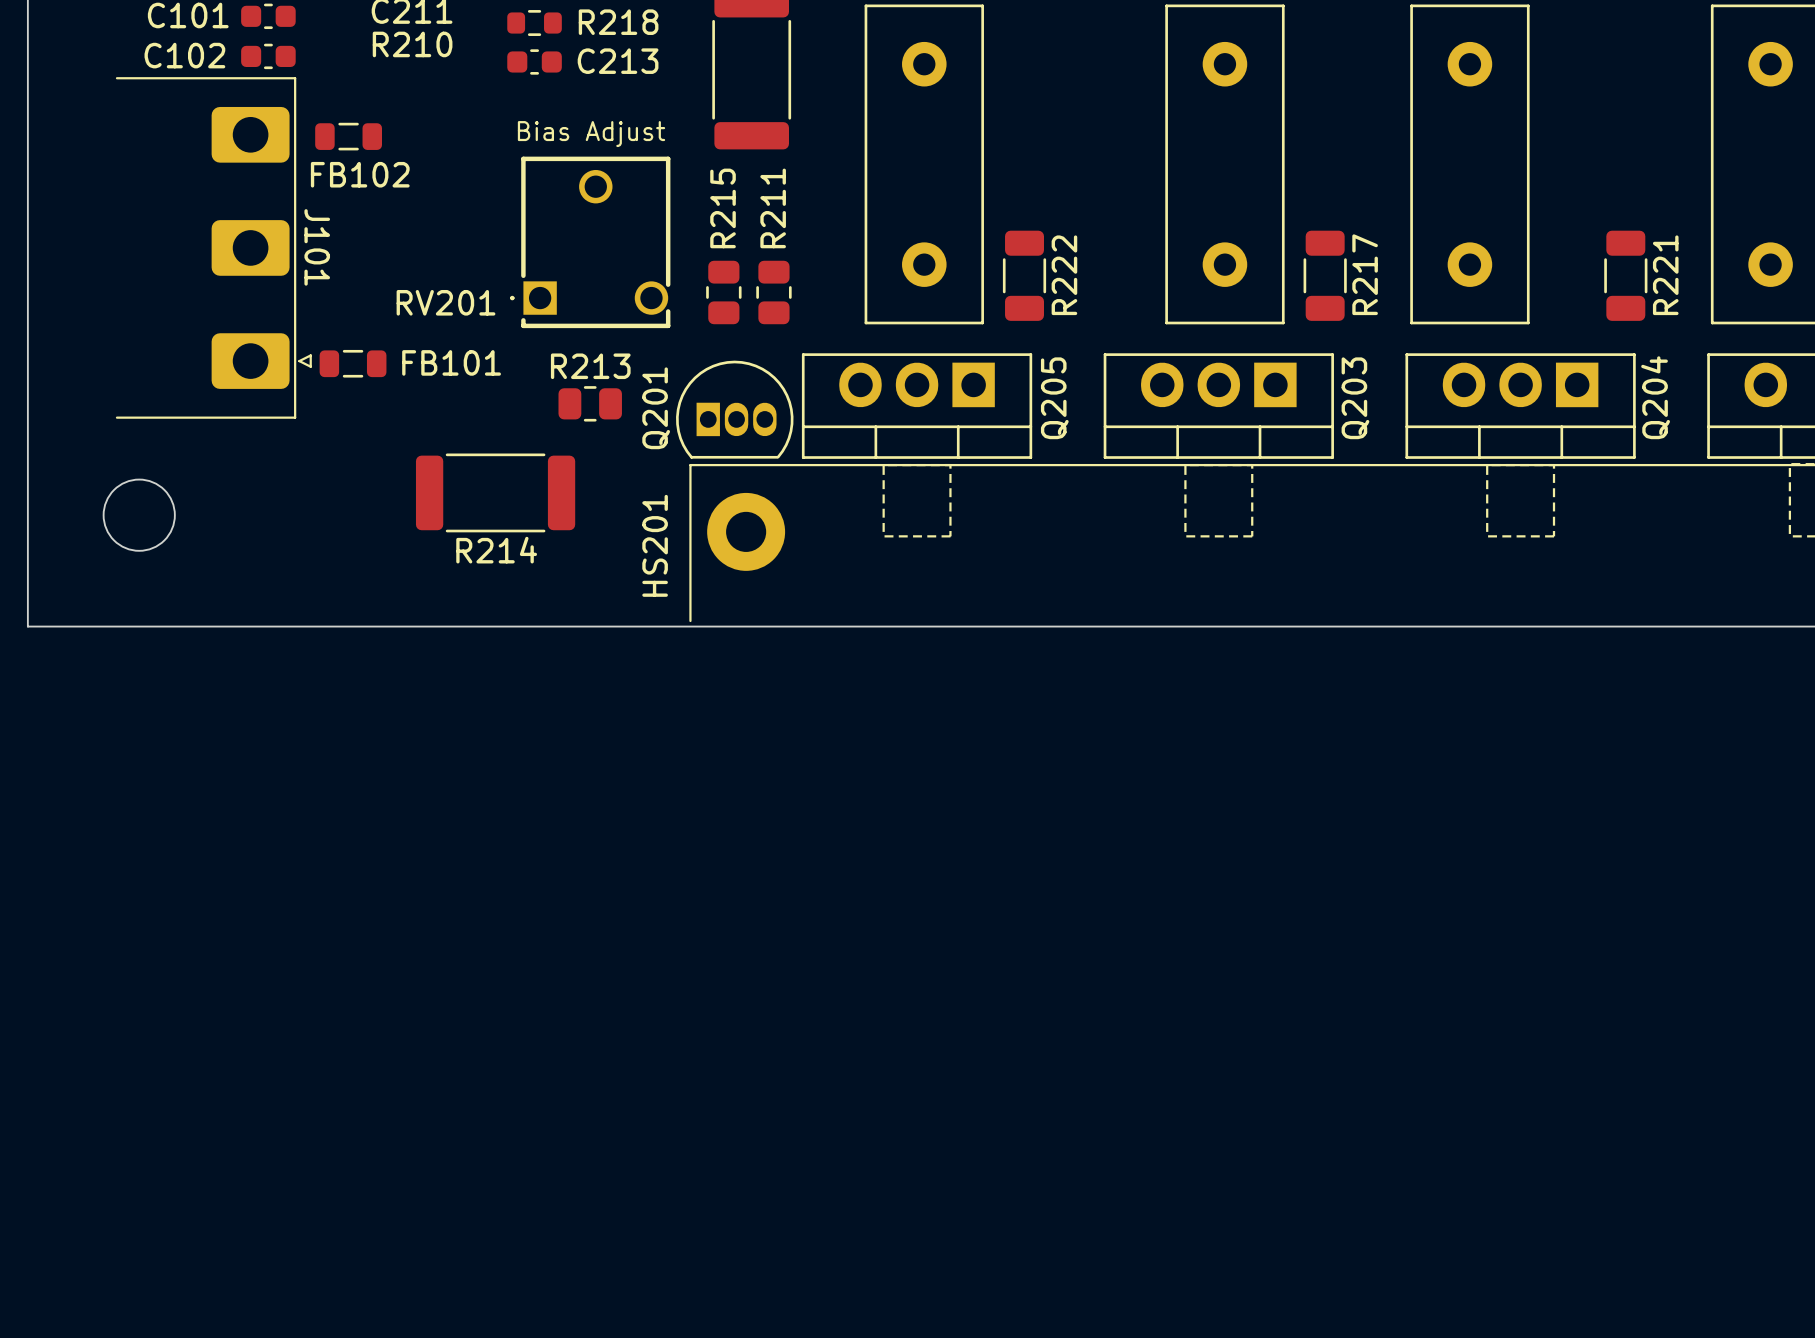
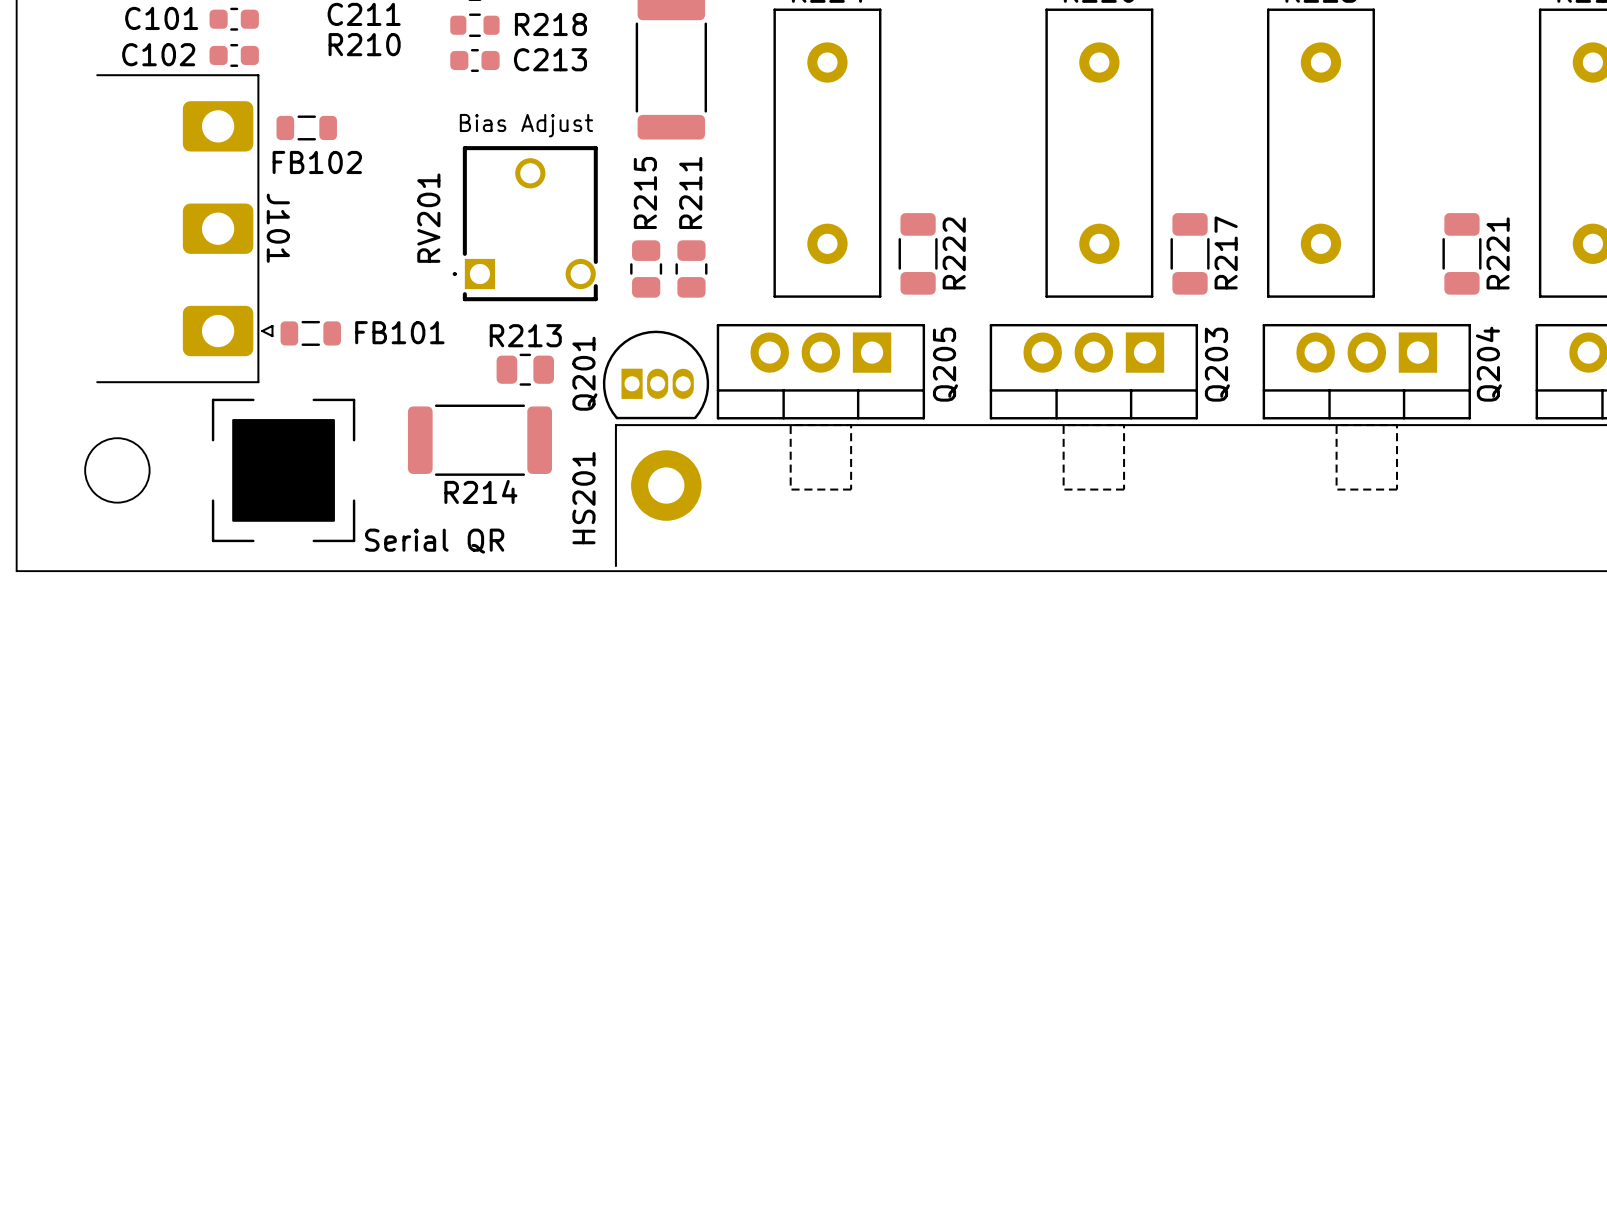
RV201 name rotation: 0° (445, 302) -> 90° counterclockwise (428, 218)
drawing: none -> [211, 398, 356, 543]
R214 position: (495, 492) -> (479, 440)

